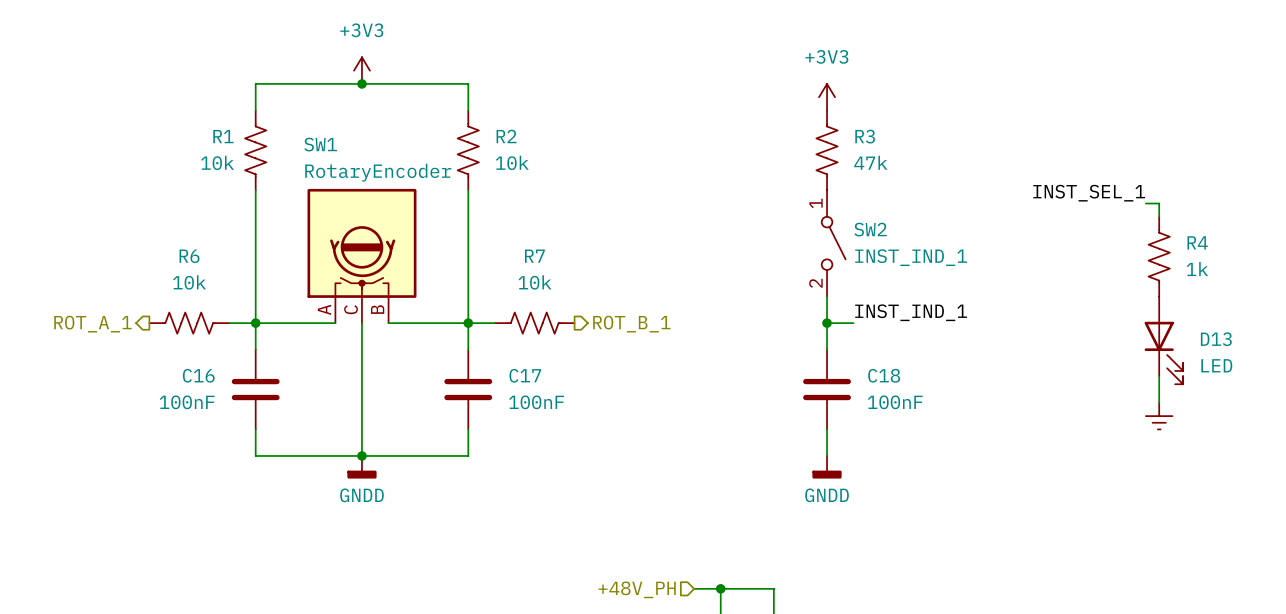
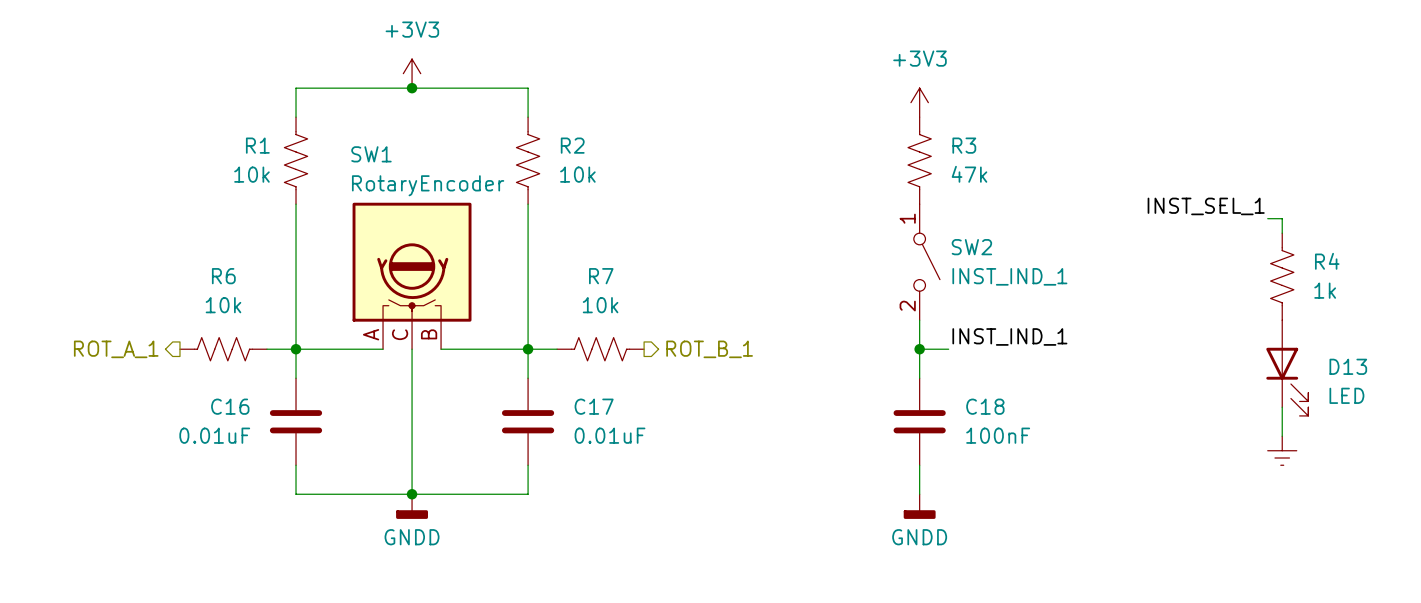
C16 value: 100nF (187, 402) -> 0.01uF (214, 435)
C17 value: 100nF (536, 402) -> 0.01uF (610, 435)

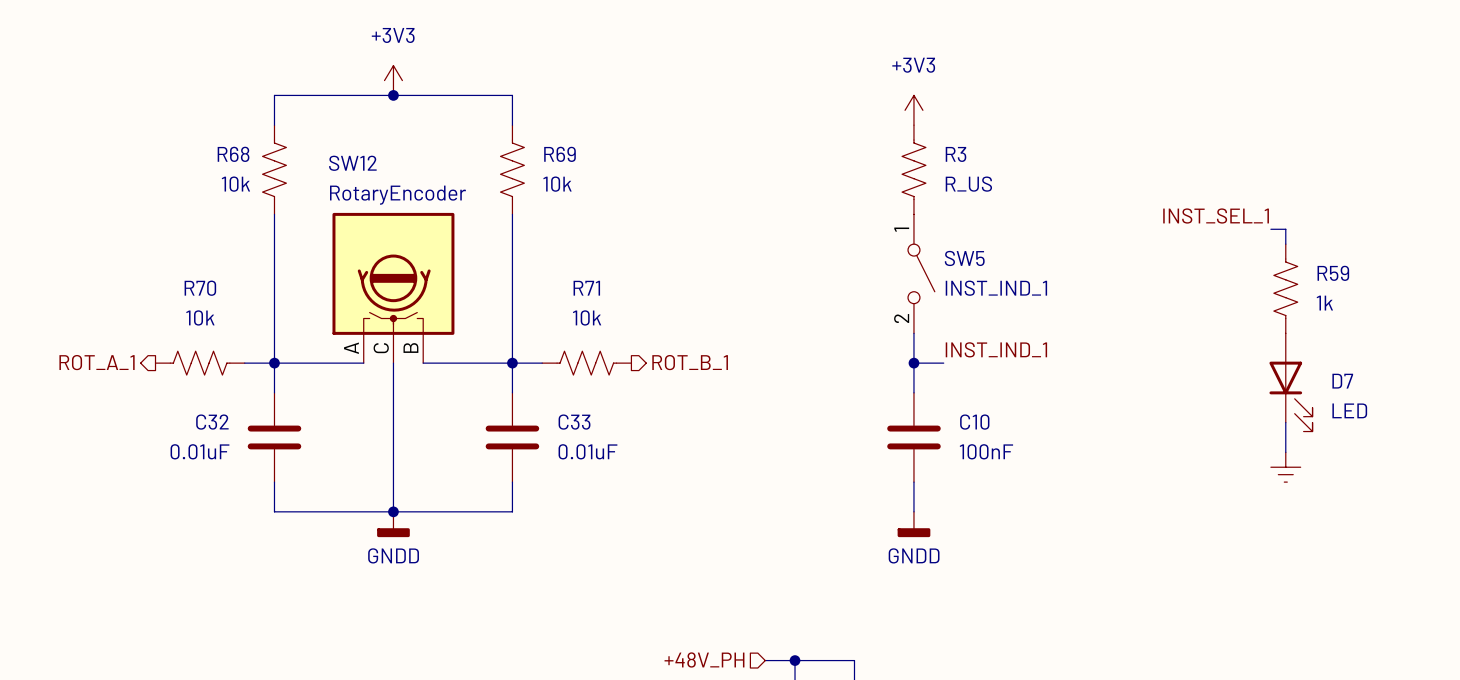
R1 name: R1 (257, 145) -> R68 (233, 154)
R2 name: R2 (572, 145) -> R69 (559, 154)
SW1 name: SW1 (371, 154) -> SW12 (352, 163)
R3 value: 47k (969, 174) -> R_US (968, 184)
SW2 name: SW2 (971, 247) -> SW5 (964, 258)
R4 name: R4 (1327, 261) -> R59 (1333, 273)
R6 name: R6 (223, 276) -> R70 (200, 288)
R7 name: R7 (601, 276) -> R71 (586, 288)
D13 name: D13 (1348, 366) -> D7 (1342, 381)
C16 name: C16 (230, 406) -> C32 (212, 422)
C17 name: C17 (594, 406) -> C33 (574, 422)
C18 name: C18 (985, 406) -> C10 (974, 422)

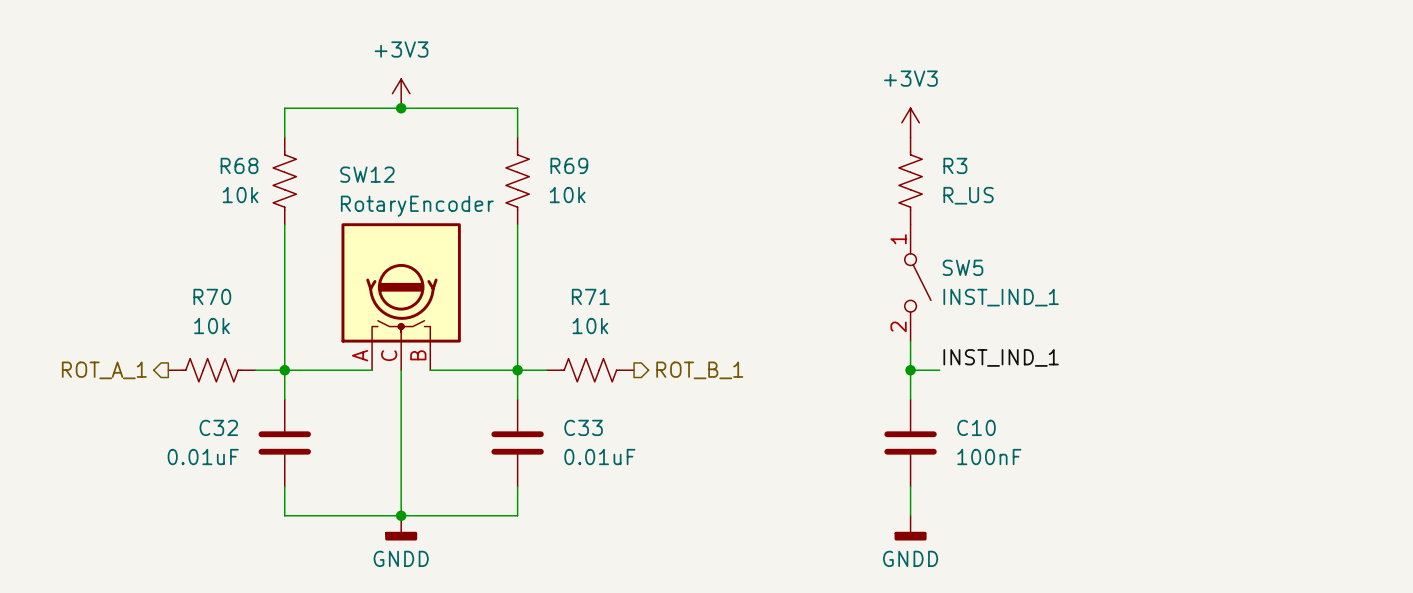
label: INST_SEL_1 (1216, 216) -> none
wire: (1270, 229) (1285, 229) (1285, 244) -> none
R59: 1k (1285, 288) -> none
D7: LED (1290, 382) -> none
wire: (1285, 422) (1285, 452) -> none
power symbol: (1285, 467) -> none

